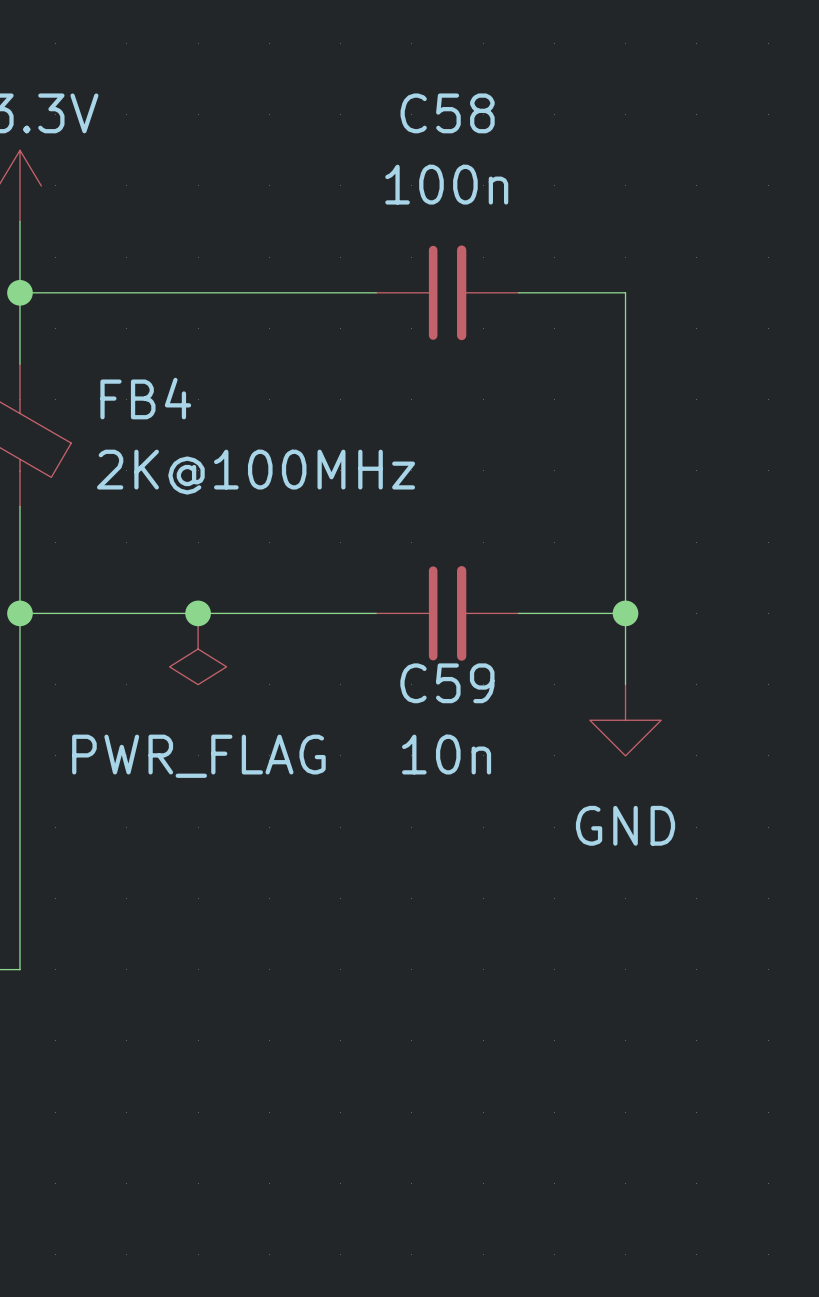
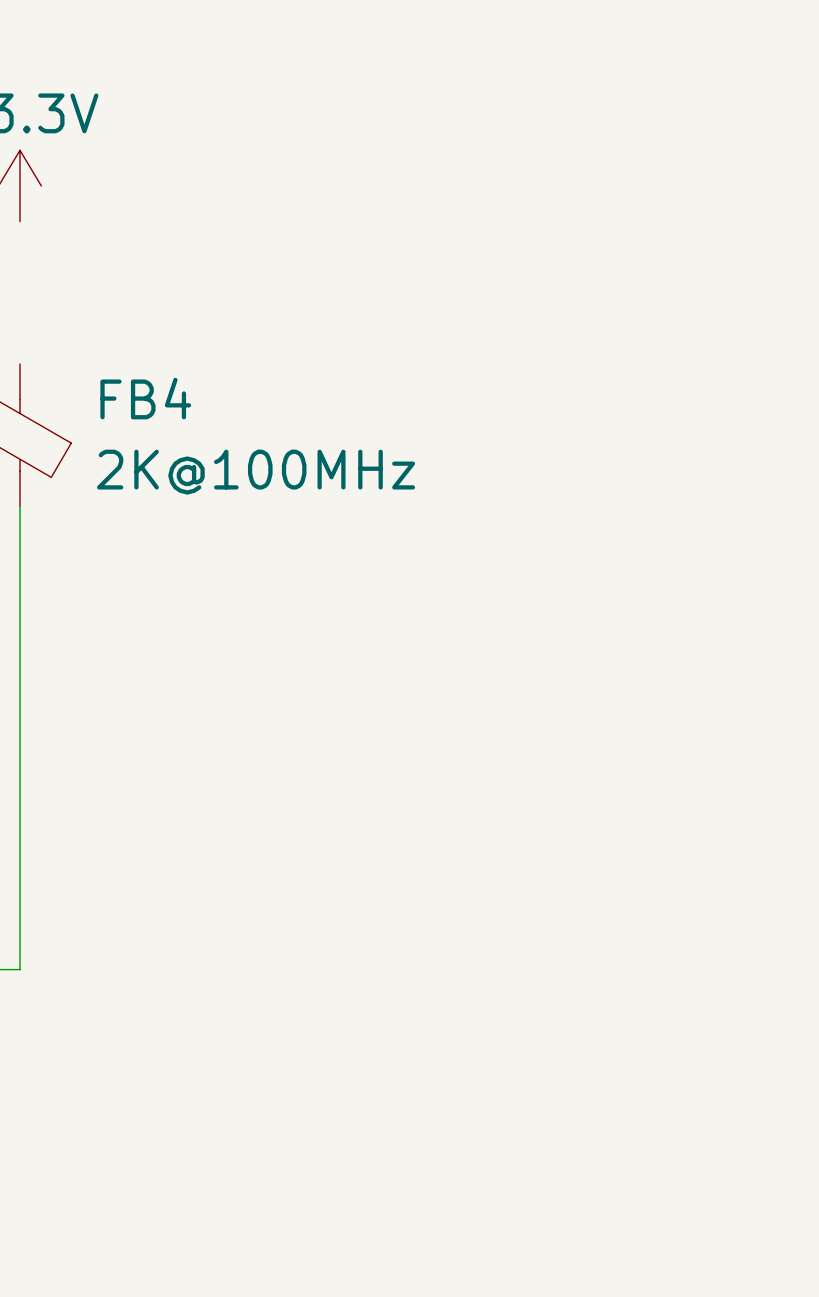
wire: (19, 221) (19, 364) -> none
wire: (19, 292) (376, 292) -> none
junction: (19, 292) -> none
C58: 100n (447, 292) -> none
wire: (518, 292) (625, 292) (625, 684) -> none
wire: (19, 613) (376, 613) -> none
junction: (19, 613) -> none
junction: (198, 613) -> none
C59: 10n (447, 613) -> none
wire: (518, 613) (625, 613) -> none
junction: (625, 613) -> none
power symbol: PWR_FLAG (198, 649) -> none
power symbol: GND (625, 720) -> none

